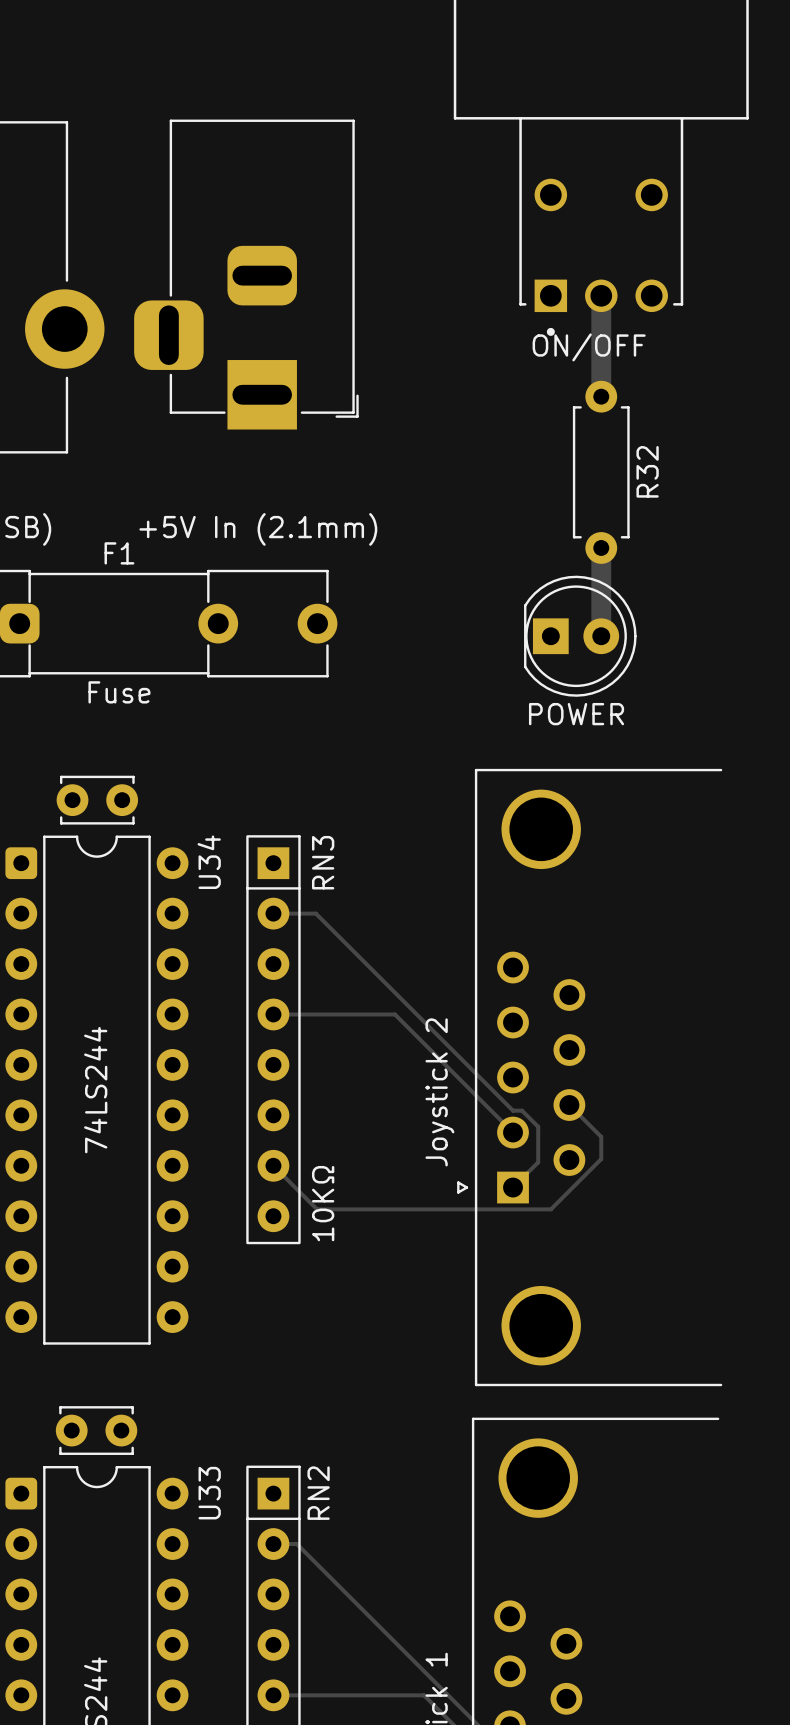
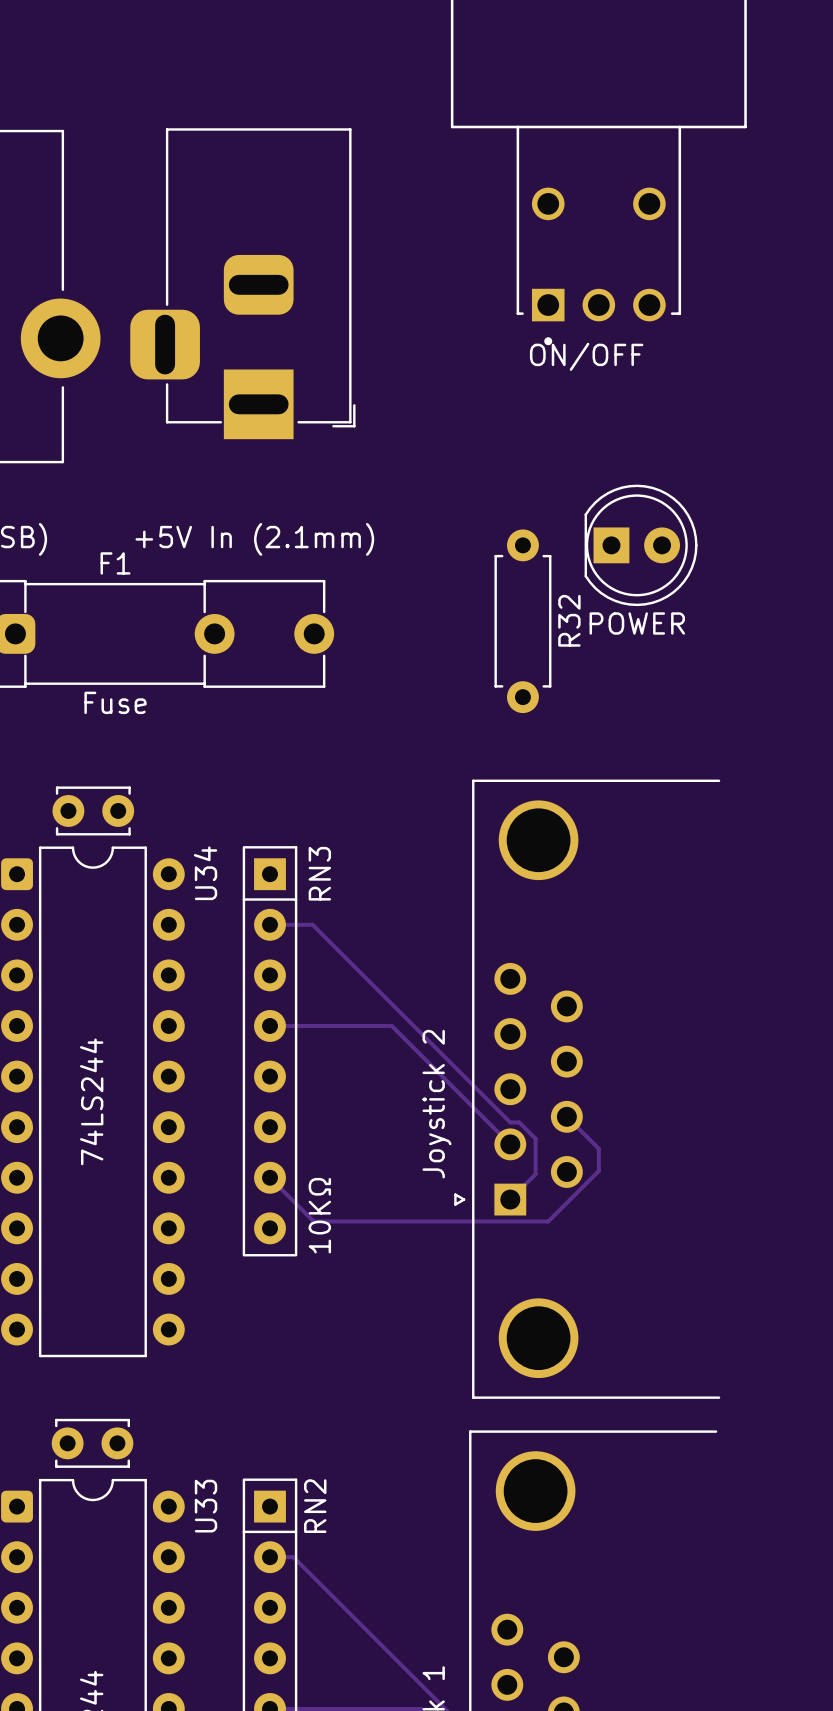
track: (601, 295) (601, 396) -> none
R32 position: (601, 472) -> (522, 621)
track: (601, 547) (601, 636) -> none
part position: (580, 636) -> (641, 545)

